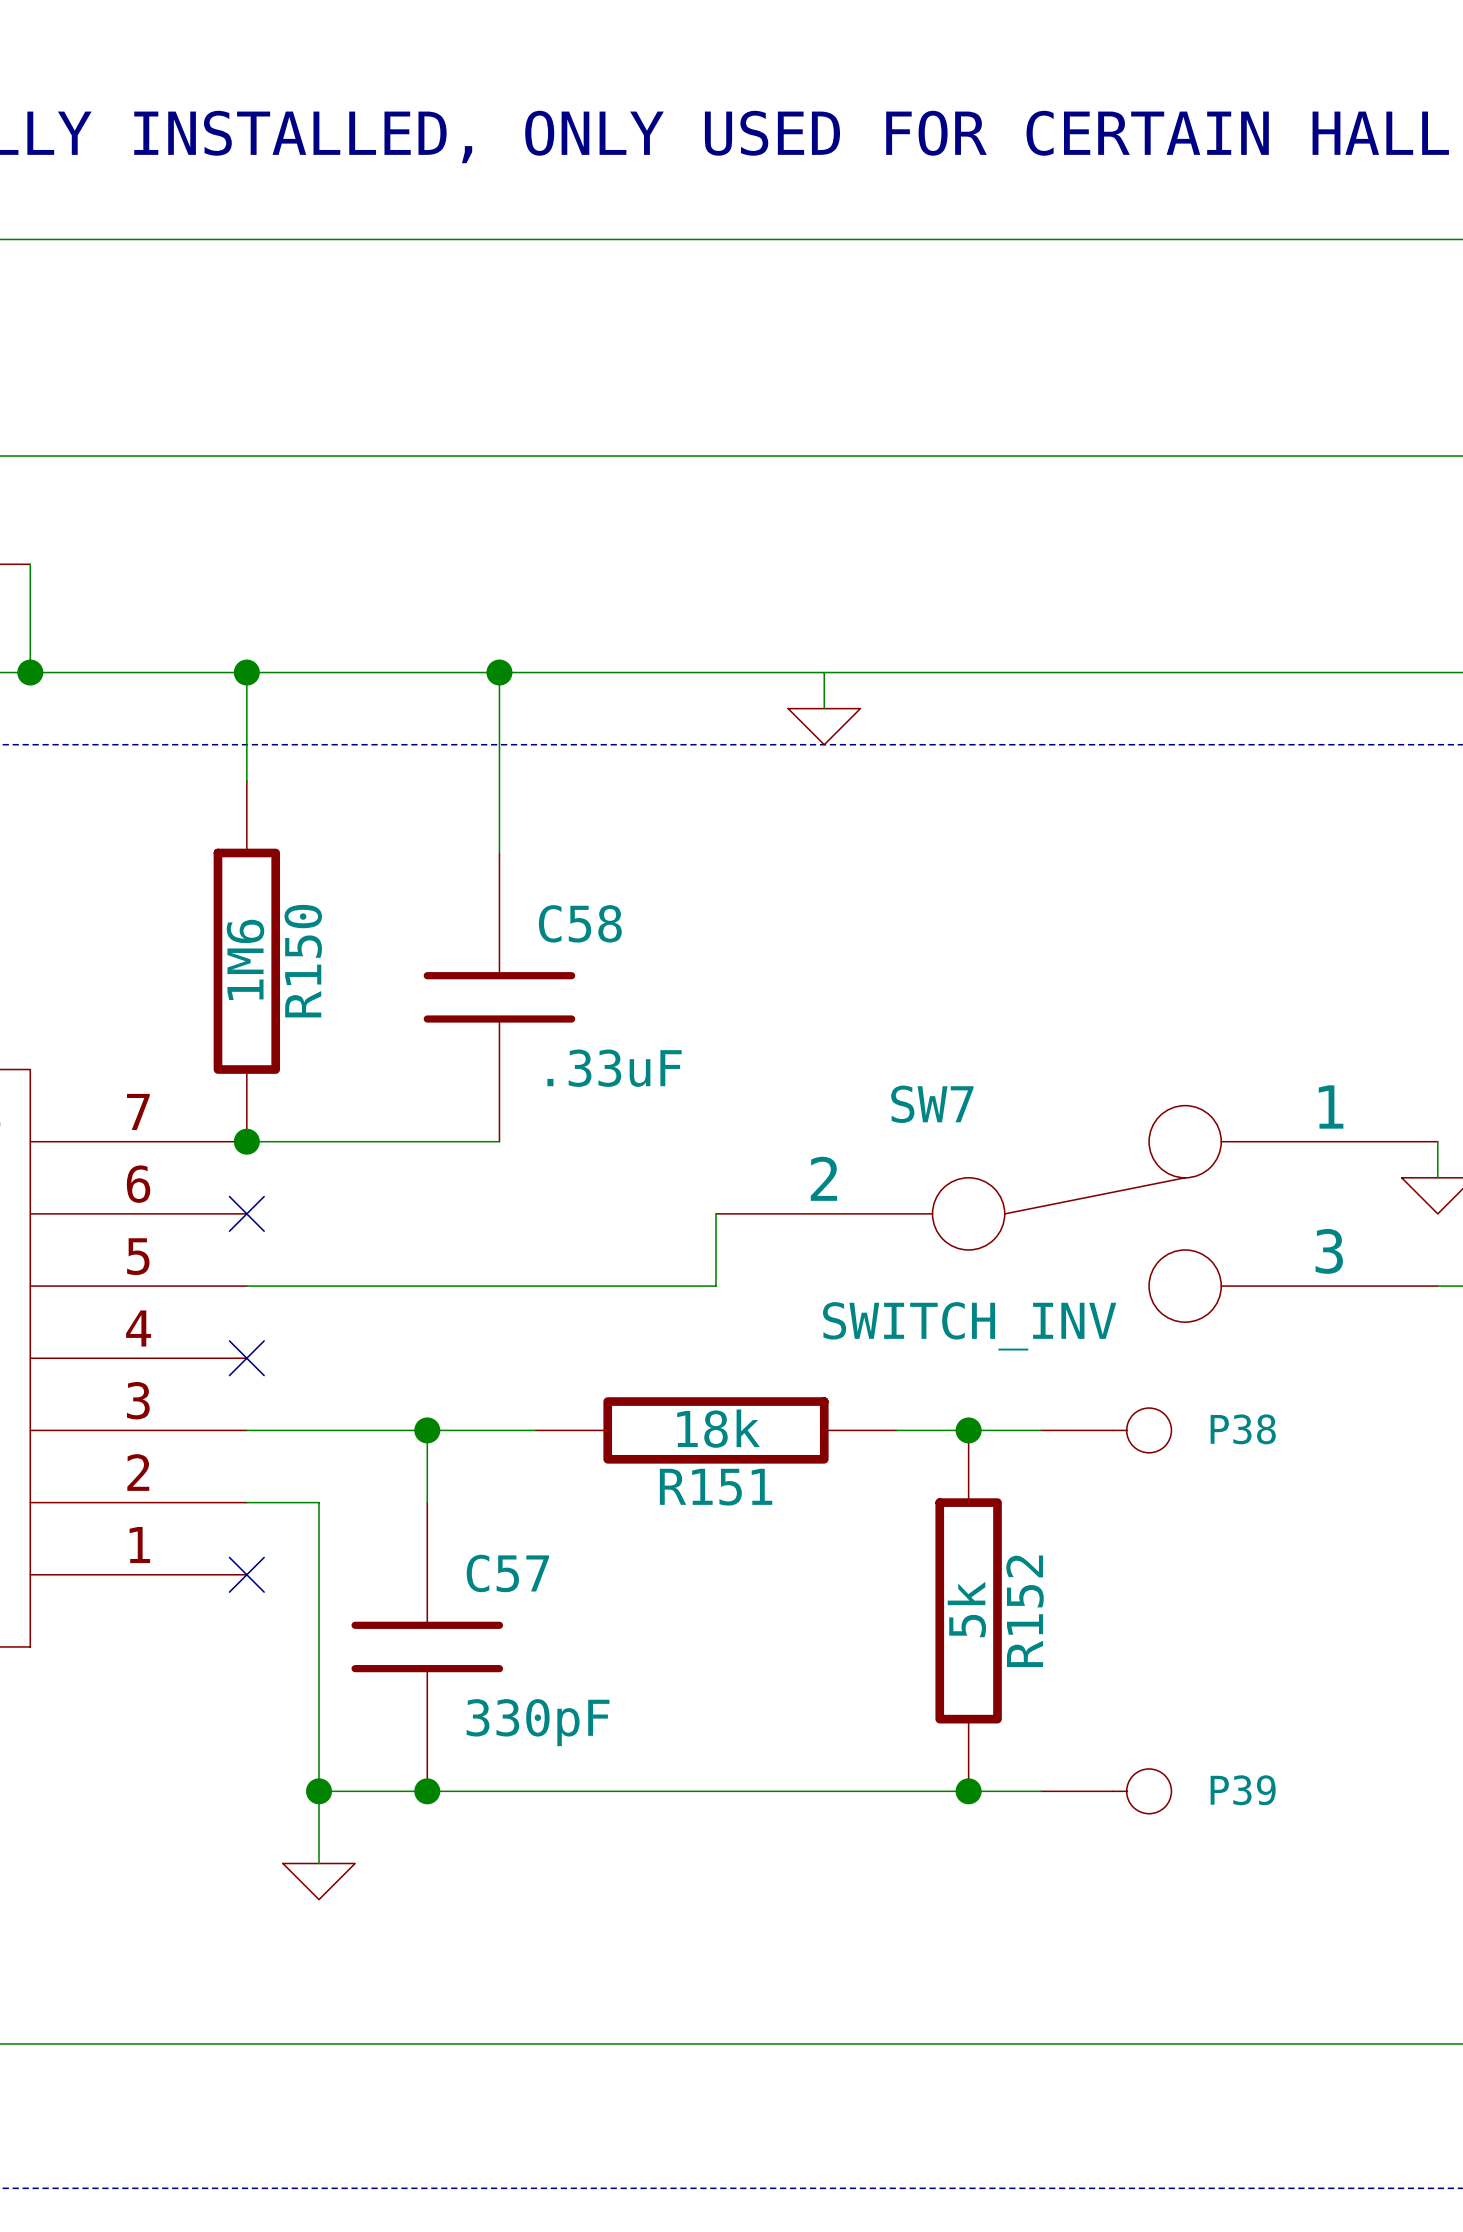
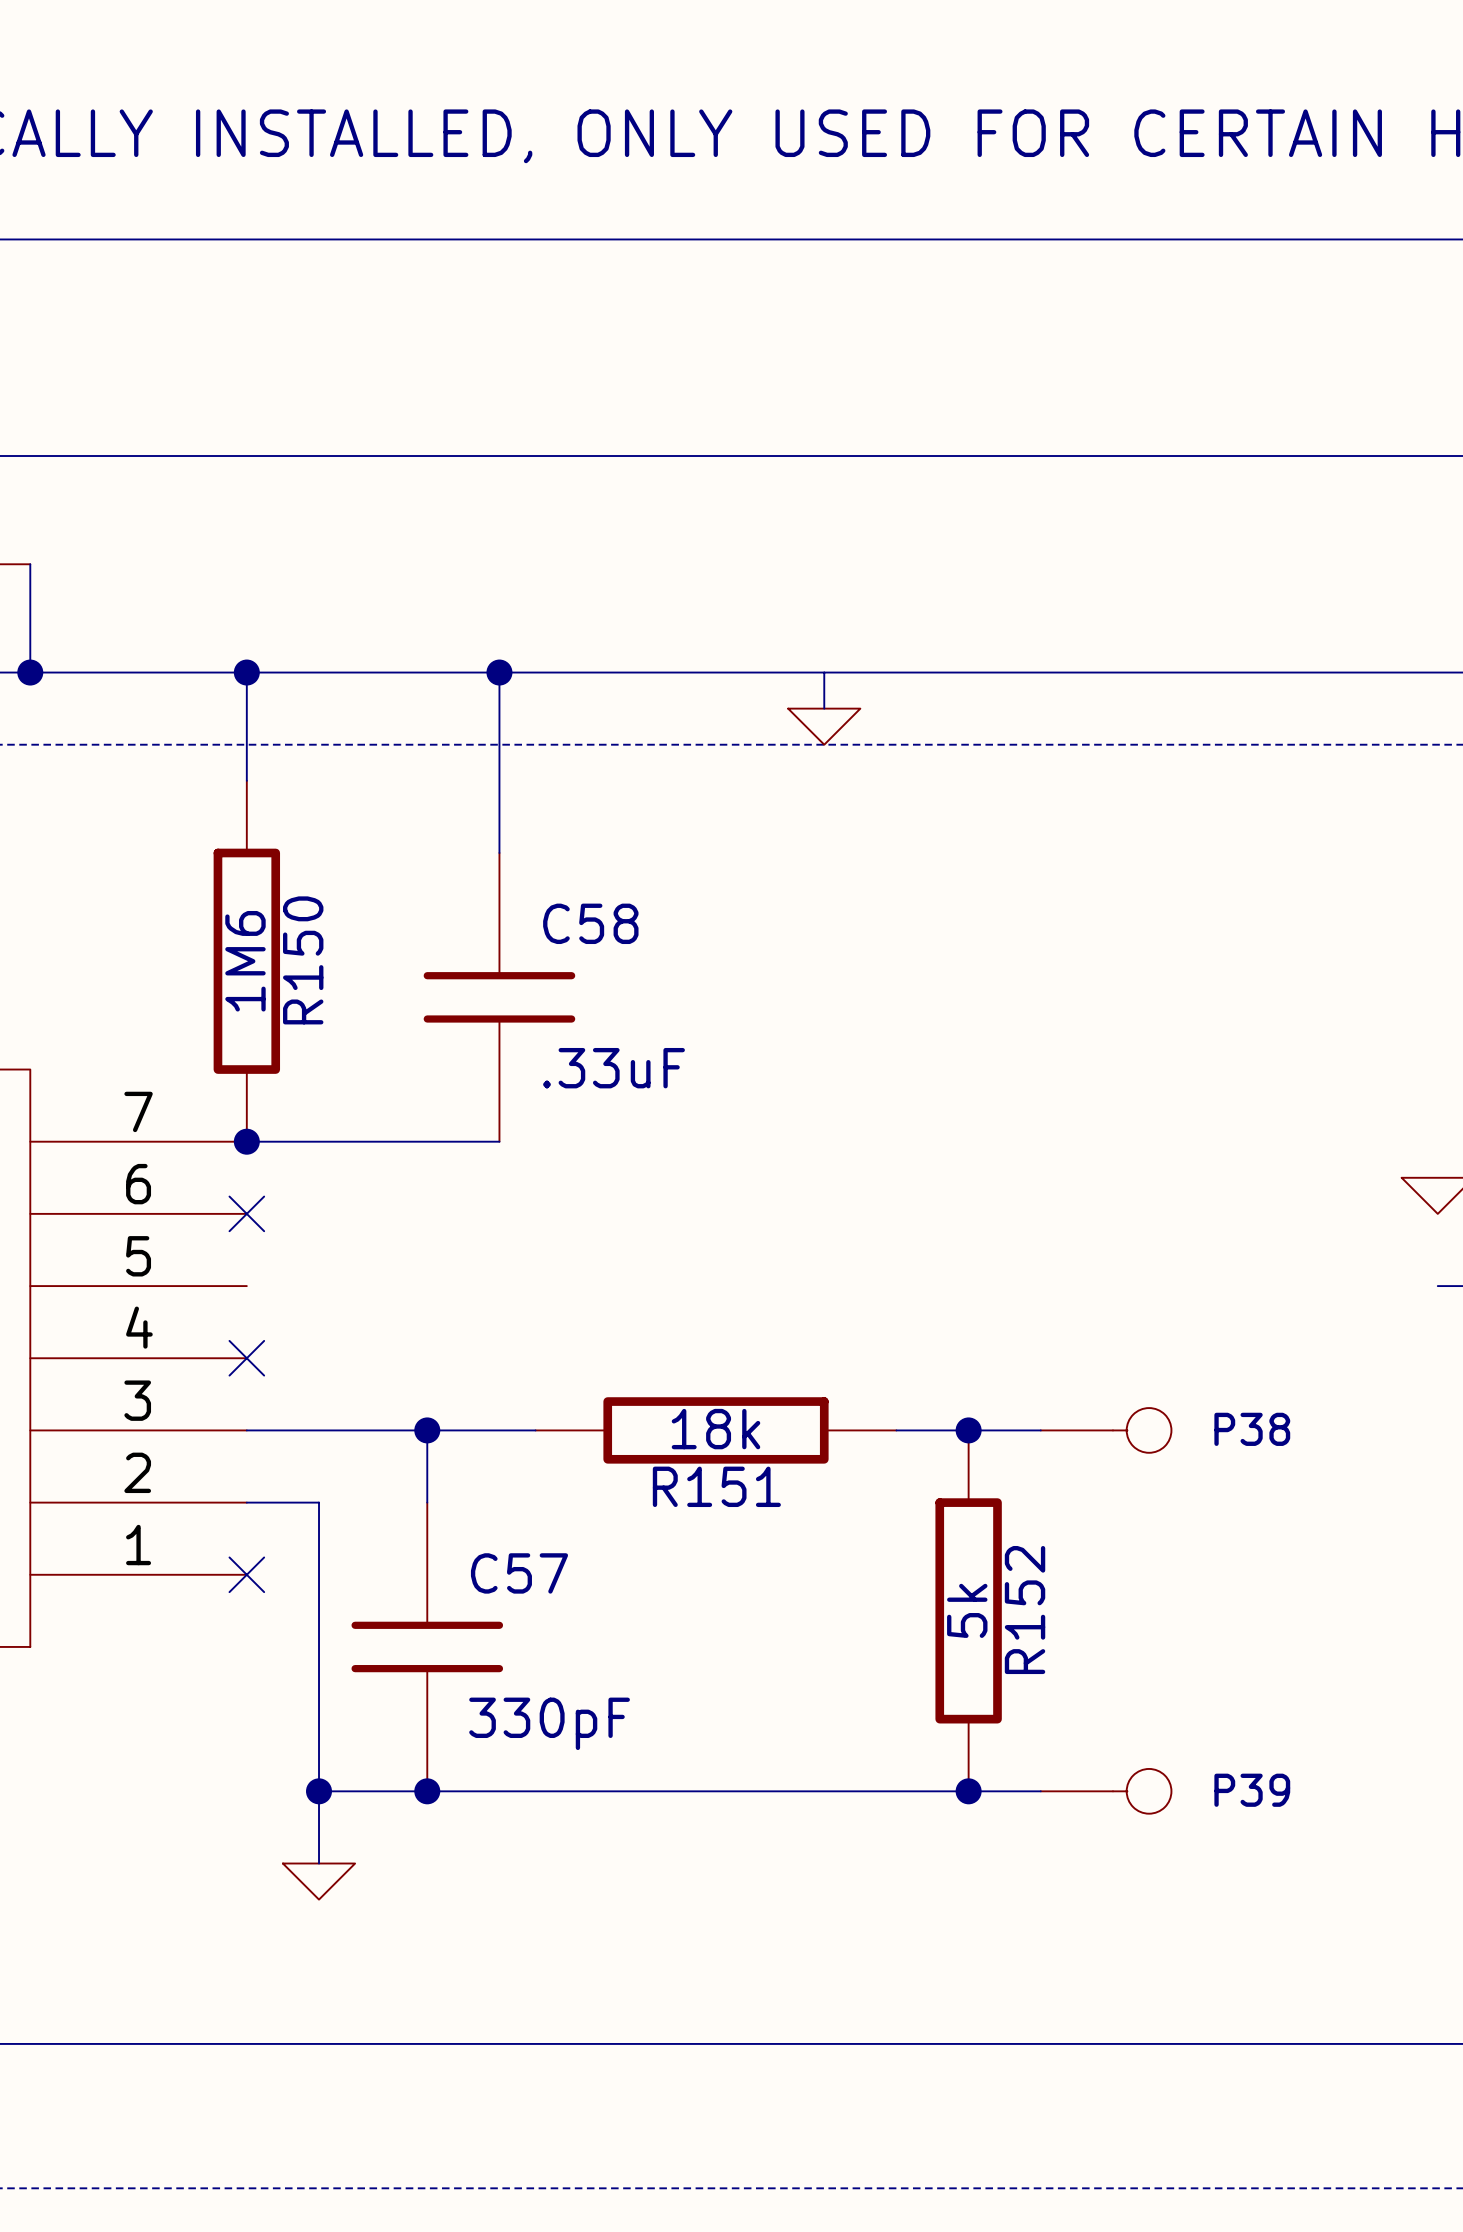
wire: (1437, 1141) (1437, 1177) -> none
wire: (715, 1213) (715, 1286) (246, 1286) -> none
SW7: SWITCH_INV (1076, 1213) -> none

